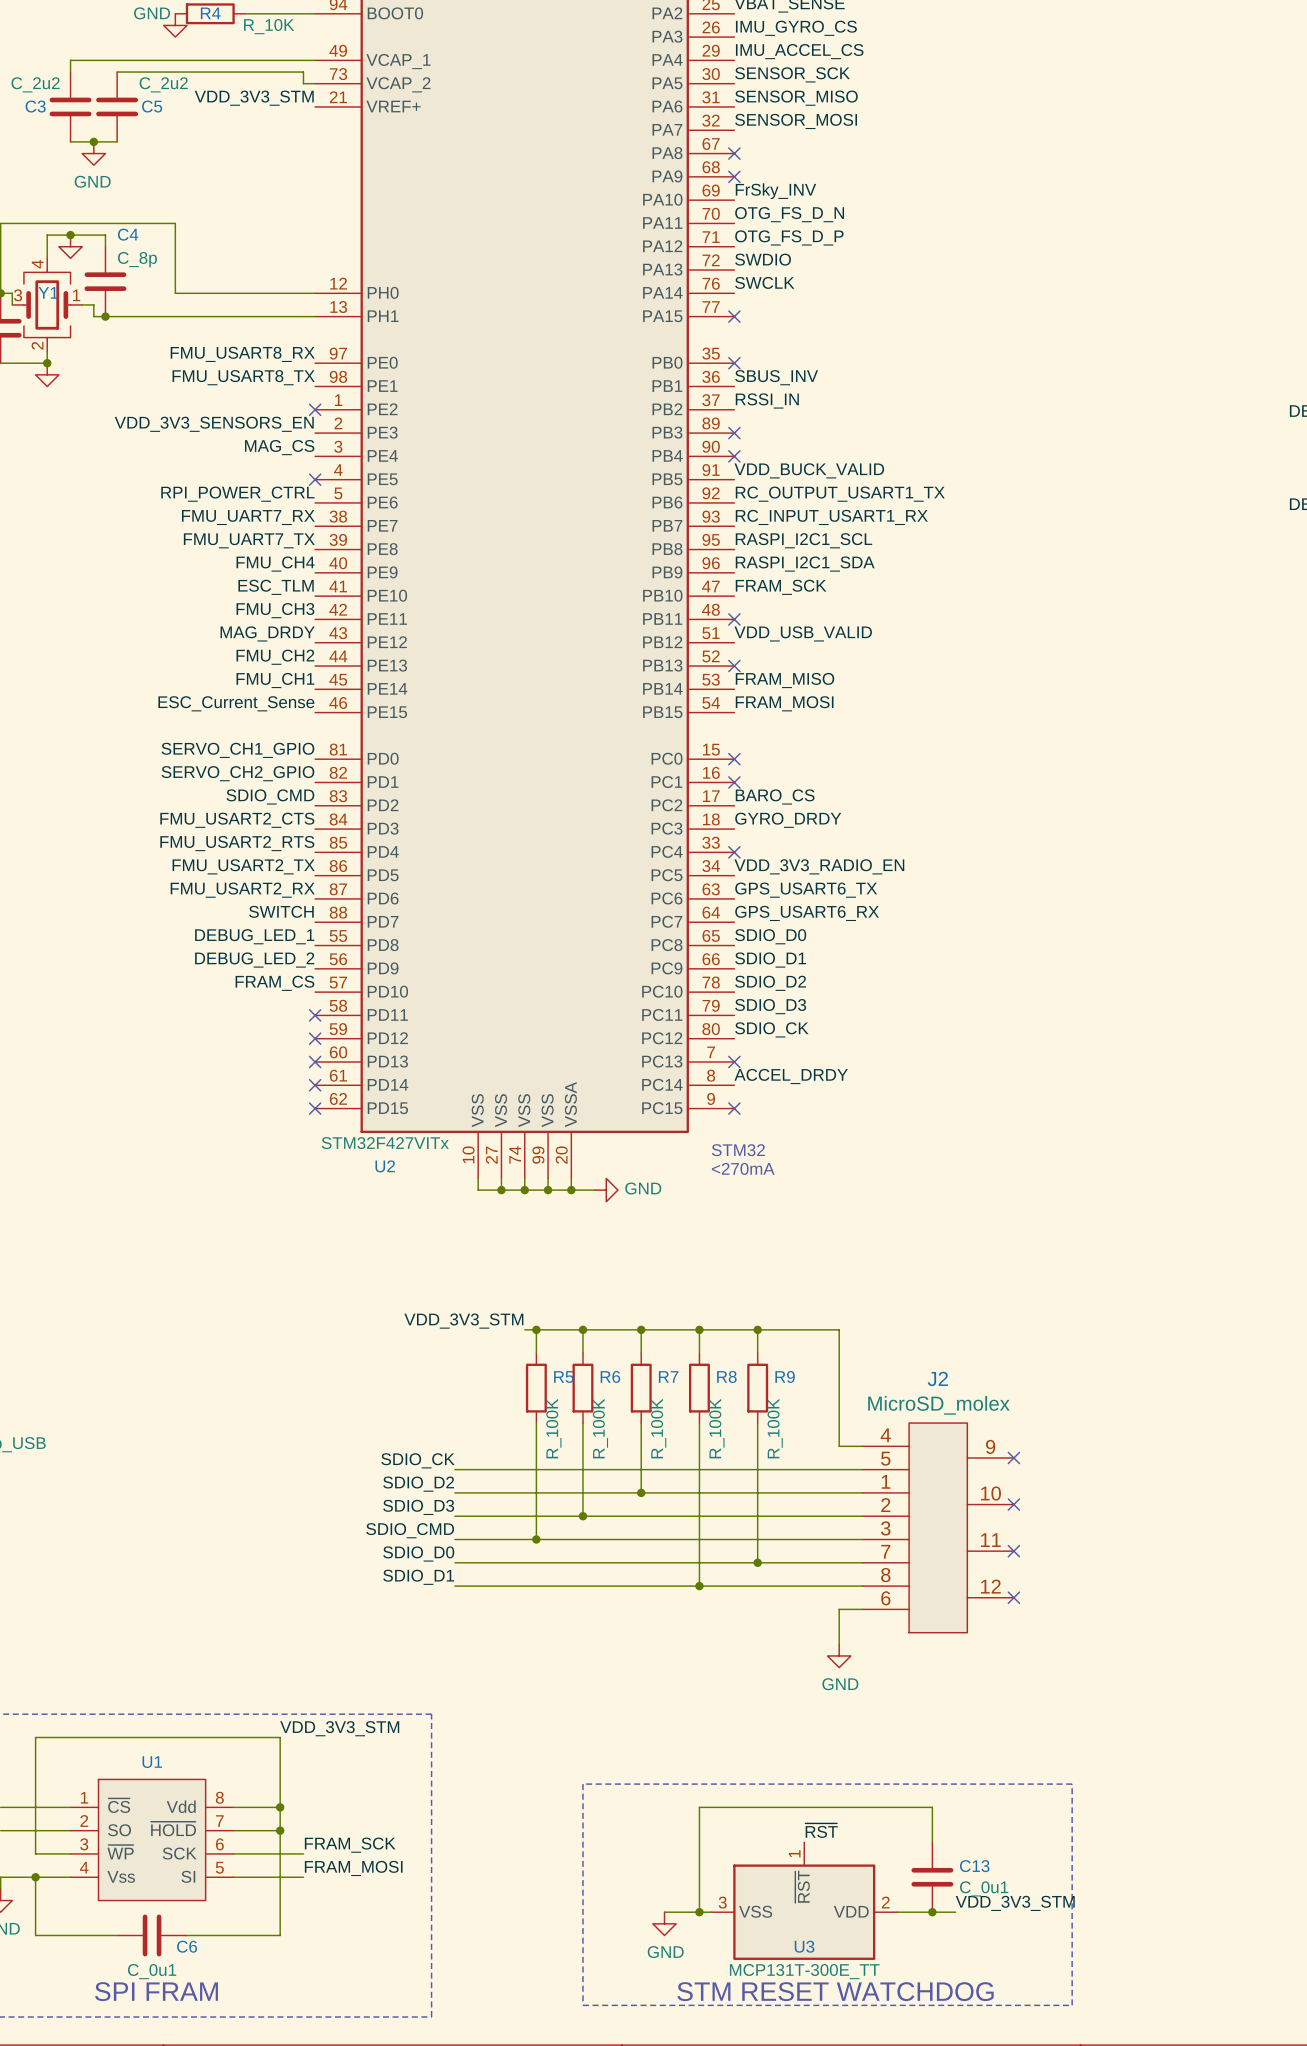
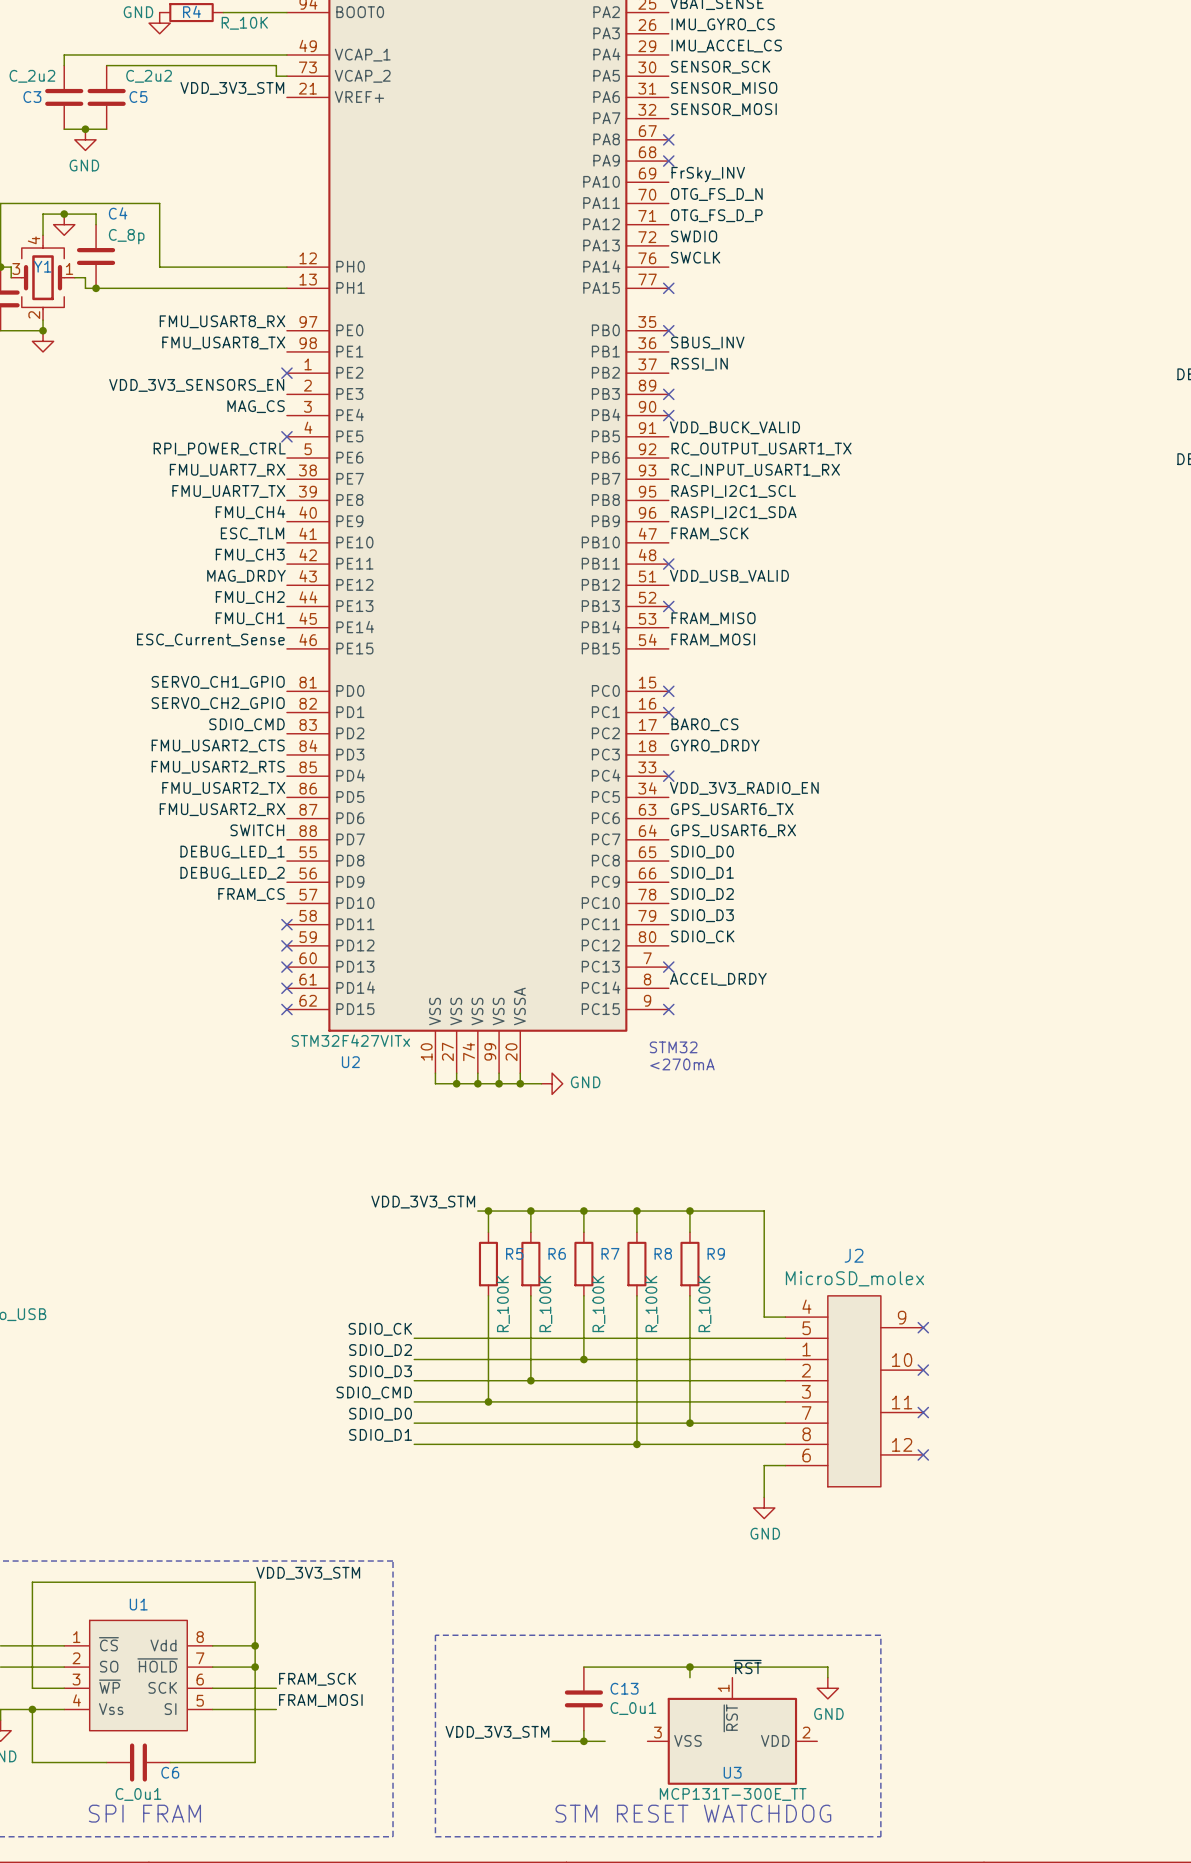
line: (582, 1784) (1072, 1784) (1072, 2005) (582, 2005) (582, 1784) -> (435, 1635) (880, 1635) (880, 1836) (435, 1836) (435, 1635)
wire: none -> (583, 1667) (827, 1667) (827, 1677)
wire: none -> (689, 1667) (689, 1677)
junction: none -> (689, 1667)
wire: (932, 1842) (932, 1807) (699, 1807) (699, 1912) -> none
power symbol: none -> GND (827, 1688)
C13 position: (932, 1877) -> (583, 1698)
wire: none -> (583, 1730) (583, 1741)
label: none -> VDD_3V3_STM (497, 1732)
label: VDD_3V3_STM (1015, 1903) -> none
junction: none -> (583, 1741)
wire: (664, 1912) (711, 1912) -> (605, 1741) (552, 1741)
junction: (699, 1912) -> none
wire: (897, 1912) (955, 1912) -> none
junction: (932, 1912) -> none
power symbol: GND (664, 1923) -> none
text position: STM RESET WATCHDOG (835, 1991) -> STM RESET WATCHDOG (693, 1813)

